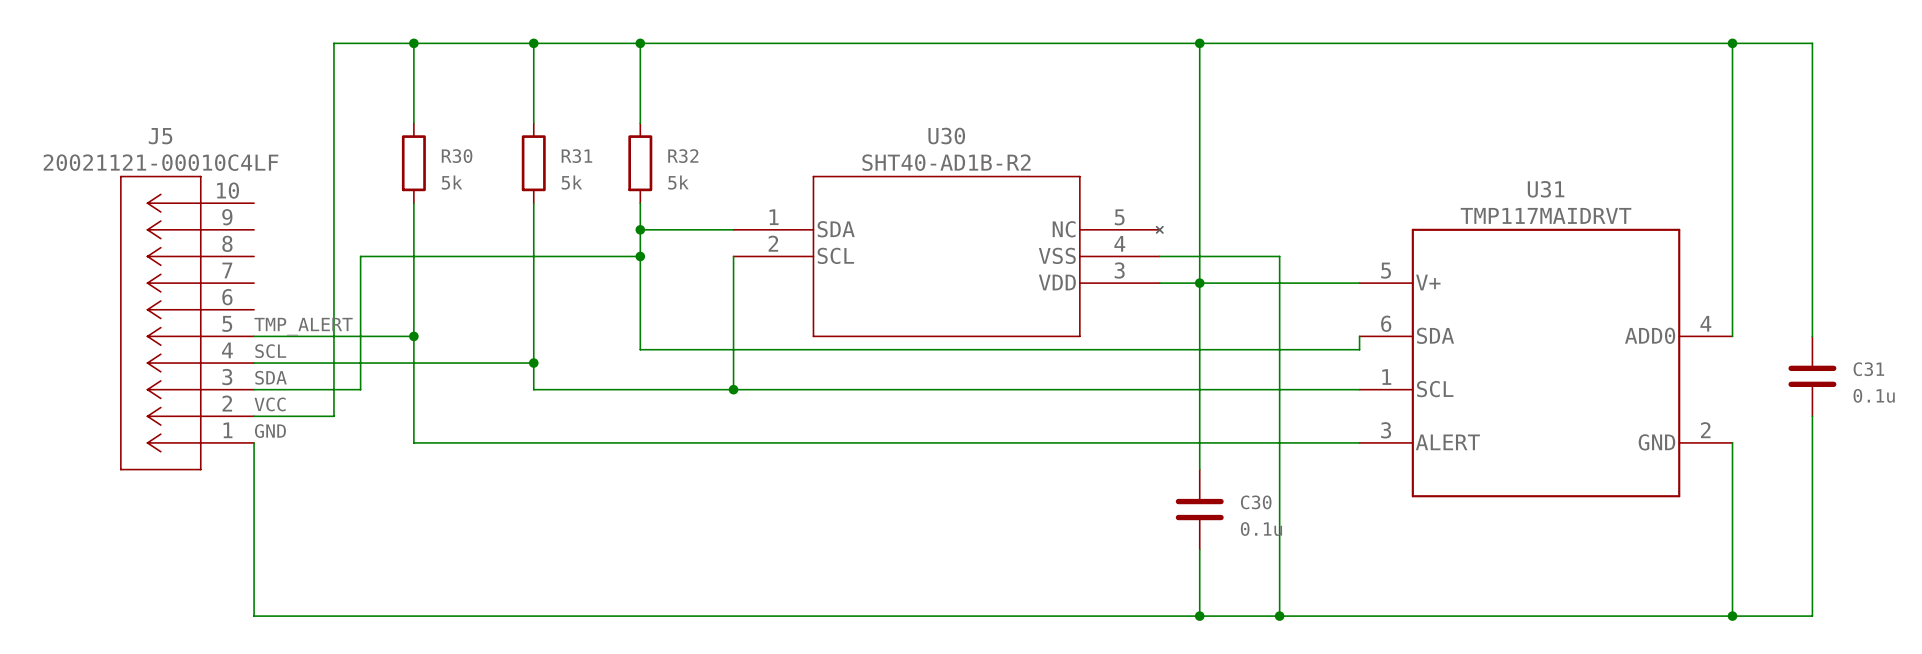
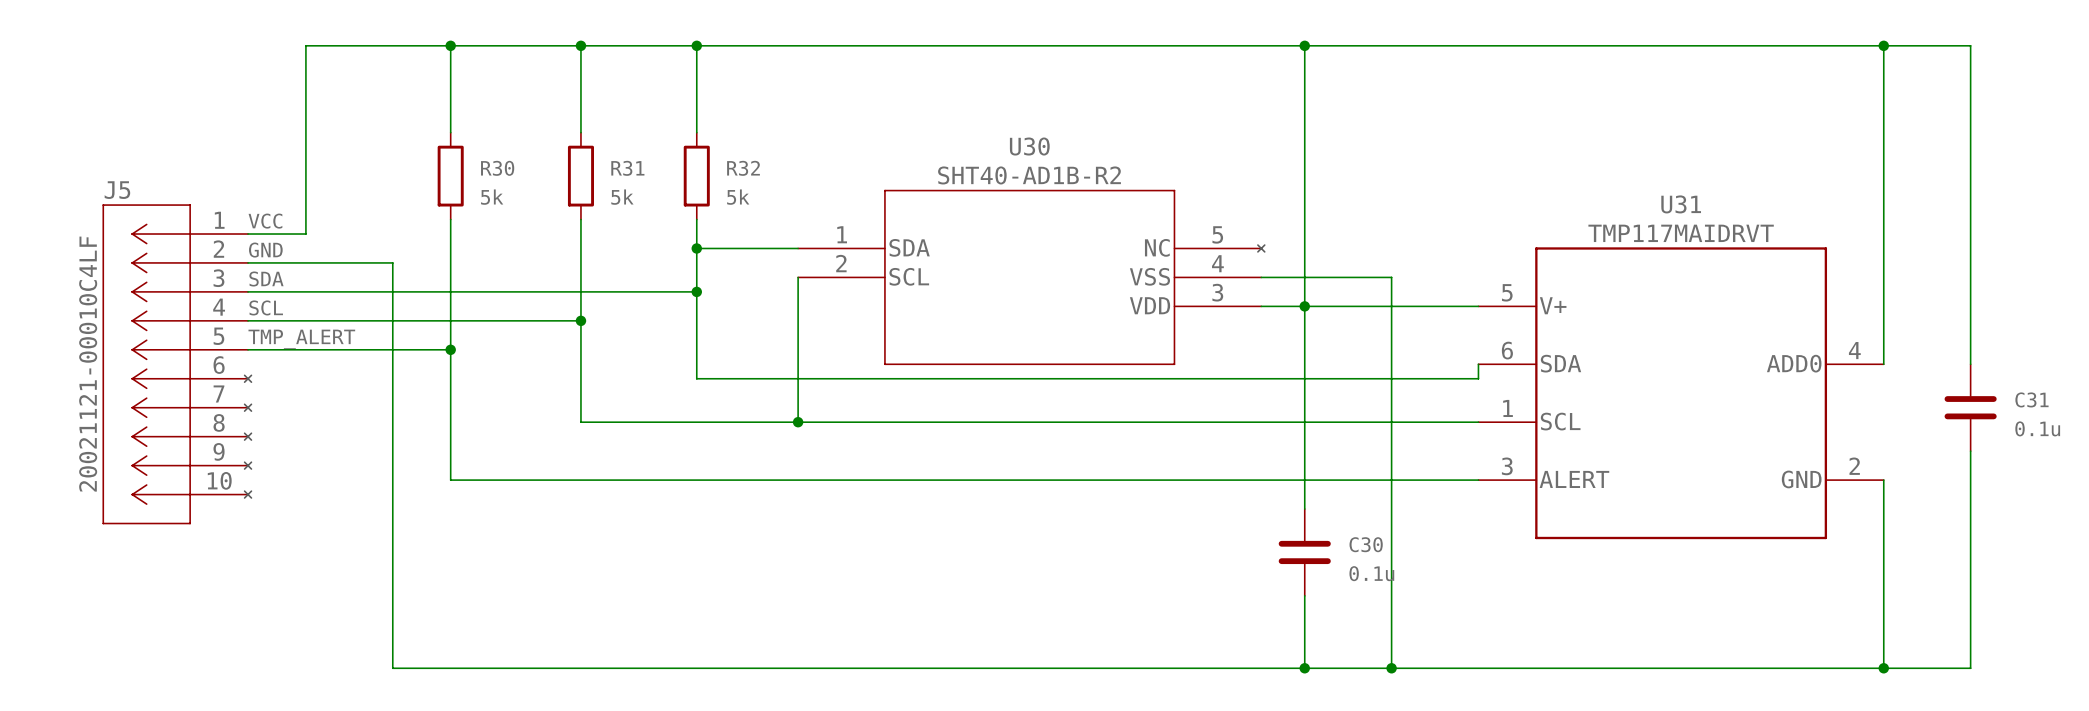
wire: (333, 43) (333, 416) (254, 416) -> (363, 45) (305, 45) (305, 234) (248, 234)
J5 name position: J5 (160, 136) -> J5 (117, 190)
J5 value position: 20021121-00010C4LF (160, 162) -> 20021121-00010C4LF (88, 364)
J5 symbol: [120, 175, 255, 471] -> [102, 204, 252, 525]
wire: (360, 256) (640, 256) -> (392, 277) (392, 262) (248, 262)
junction position: (640, 256) -> (696, 291)
wire: none -> (248, 291) (696, 291)
wire: none -> (248, 320) (580, 320)
junction: none -> (580, 320)
wire: none -> (248, 349) (450, 349)
label position: TMP_ALERT (303, 326) -> TMP_ALERT (301, 339)
wire: (254, 336) (413, 336) -> none
junction position: (413, 336) -> (450, 349)
label position: SCL (270, 351) -> SCL (266, 307)
wire: (254, 363) (533, 363) -> none
junction: (533, 363) -> none
label position: SDA (271, 377) -> SDA (266, 279)
wire: (254, 389) (360, 389) -> none
label position: VCC (270, 404) -> VCC (265, 221)
label position: GND (270, 431) -> GND (265, 250)
wire: (254, 442) (254, 616) (360, 616) -> (392, 422) (392, 668)

